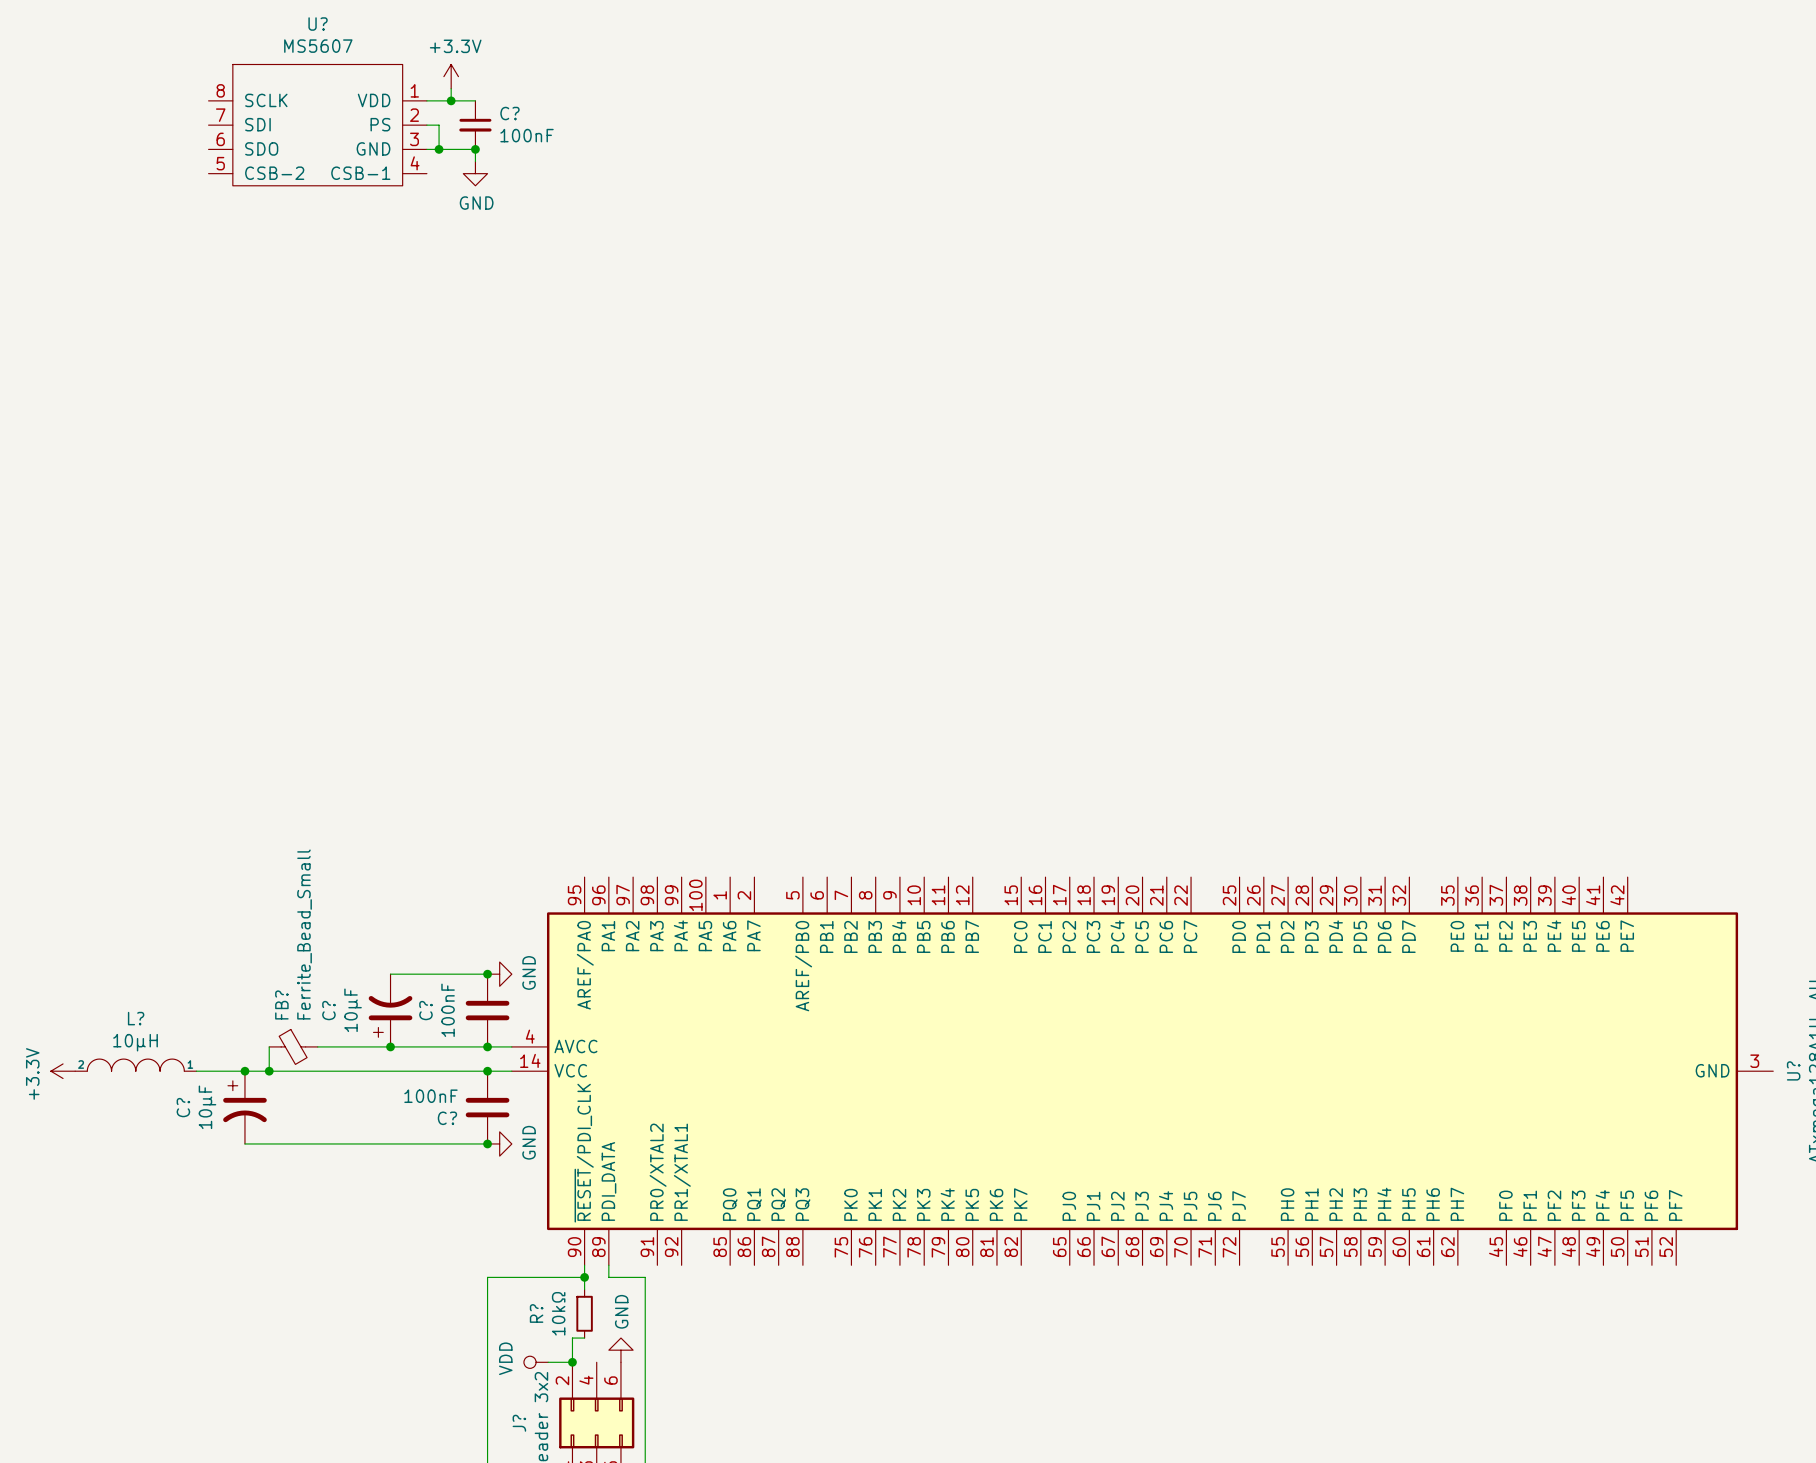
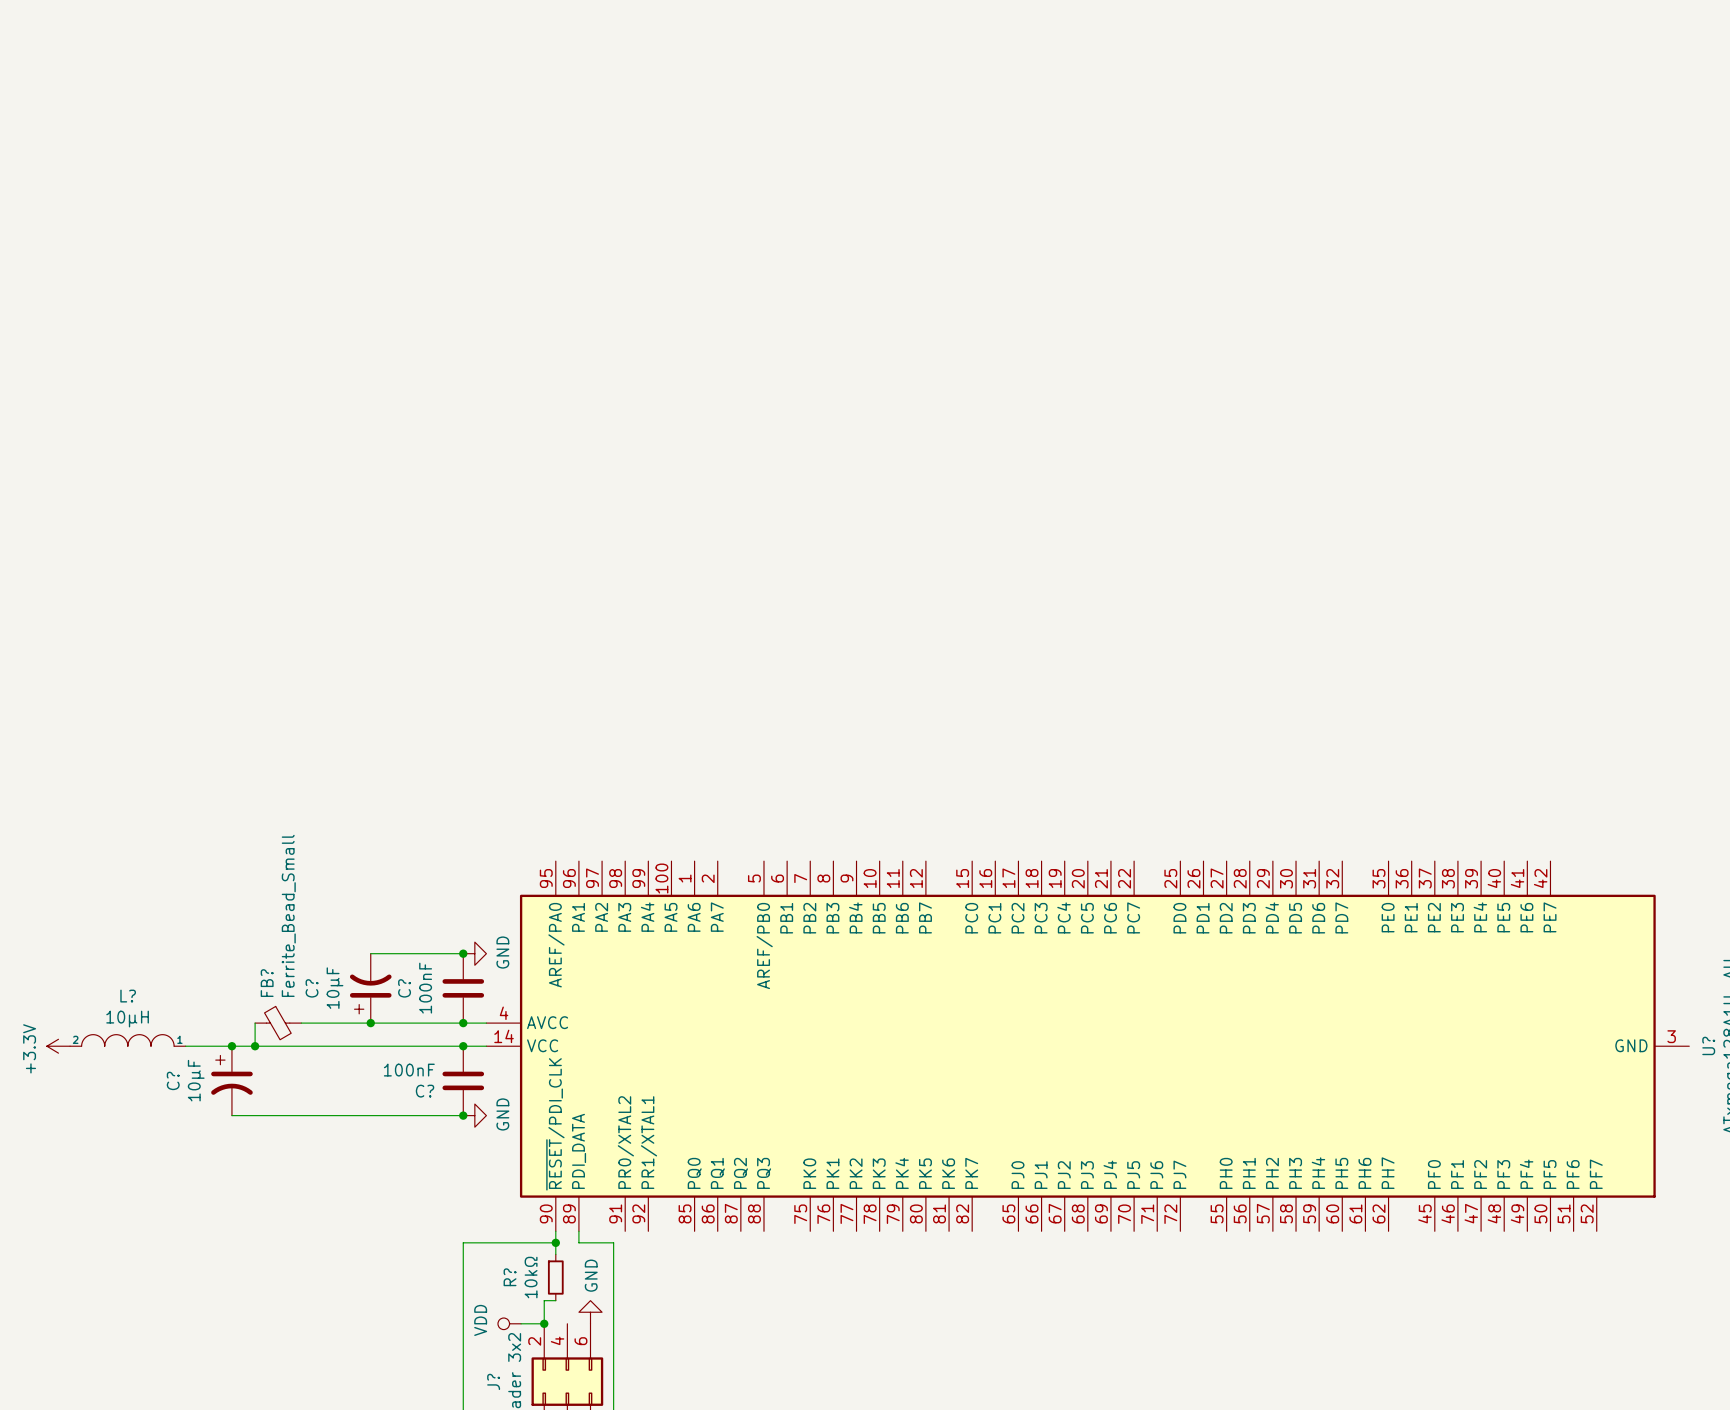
power symbol: +3.3V (451, 76) -> none
wire: (451, 88) (451, 100) -> none
wire: (426, 100) (475, 100) -> none
junction: (451, 100) -> none
U?: MS5607 (317, 125) -> none
wire: (426, 125) (439, 125) (439, 149) -> none
C?: 100nF (475, 125) -> none
wire: (426, 149) (475, 149) (475, 161) -> none
junction: (439, 149) -> none
junction: (475, 149) -> none
power symbol: GND (475, 173) -> none

